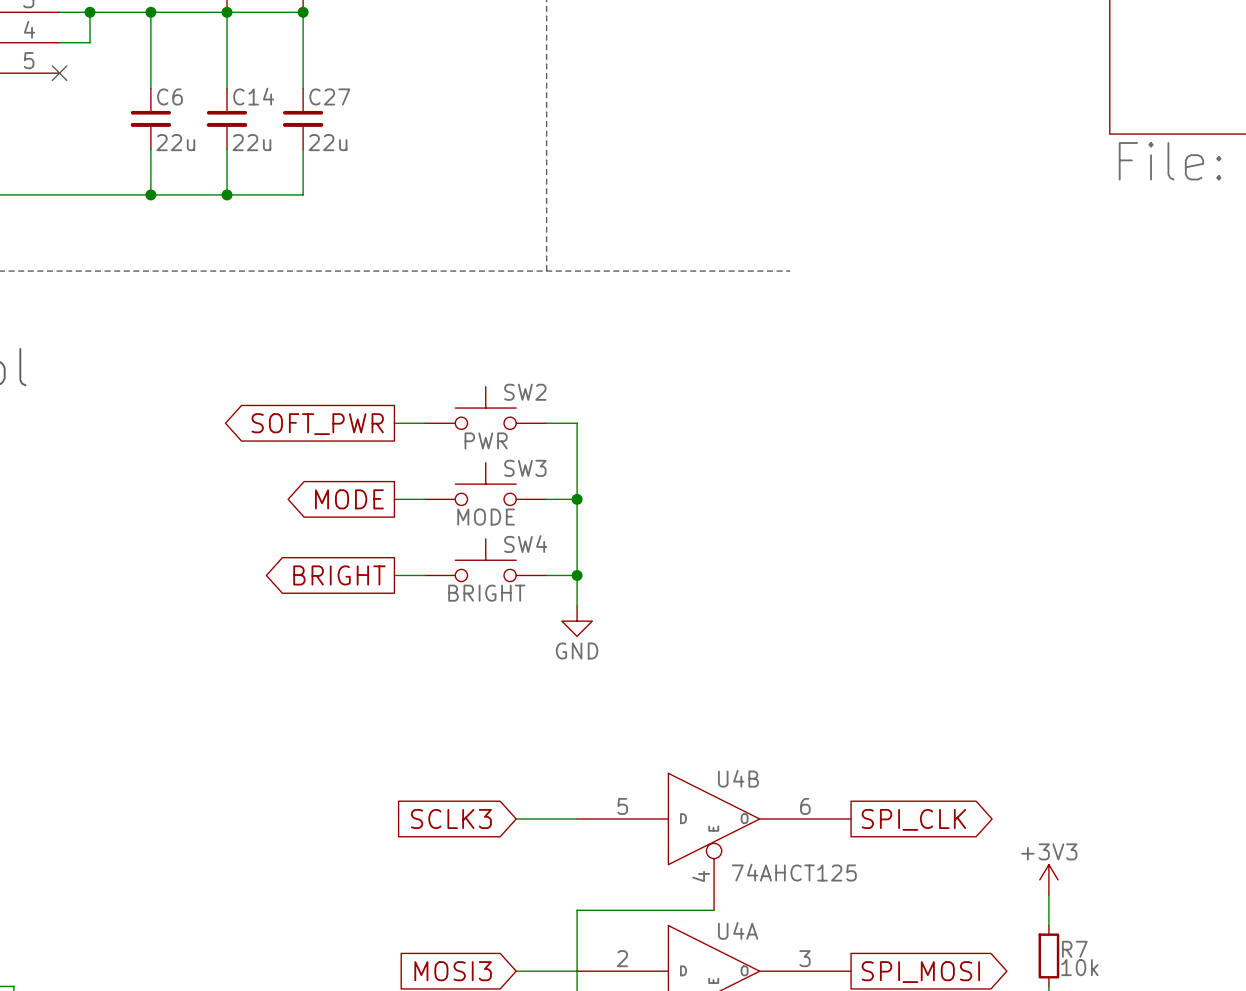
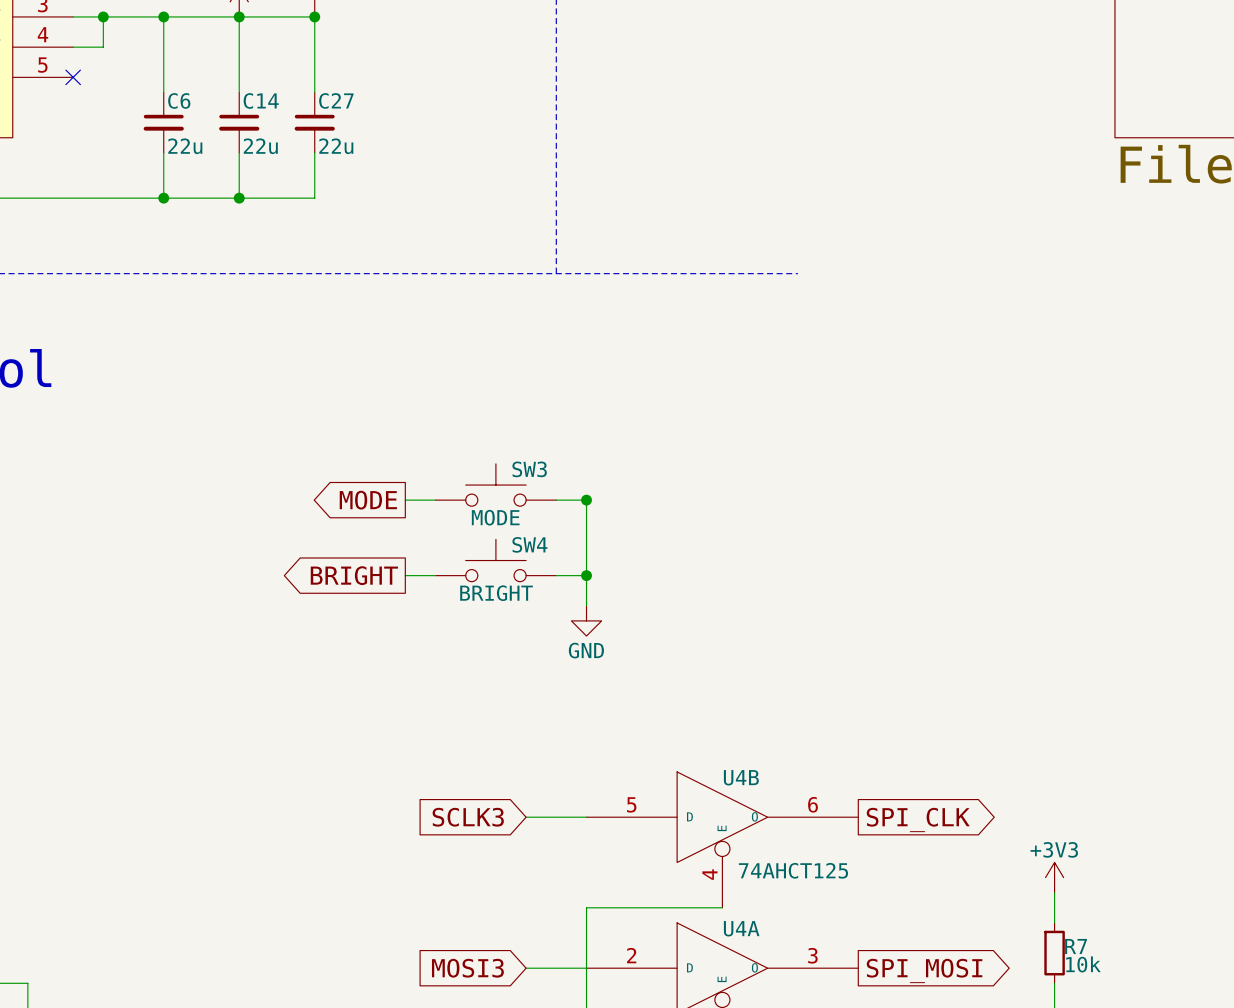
SW2: PWR (485, 408) -> none
wire: (394, 423) (424, 423) -> none
wire: (546, 423) (577, 423) (577, 499) -> none
global label: SOFT_PWR (317, 424) -> none

